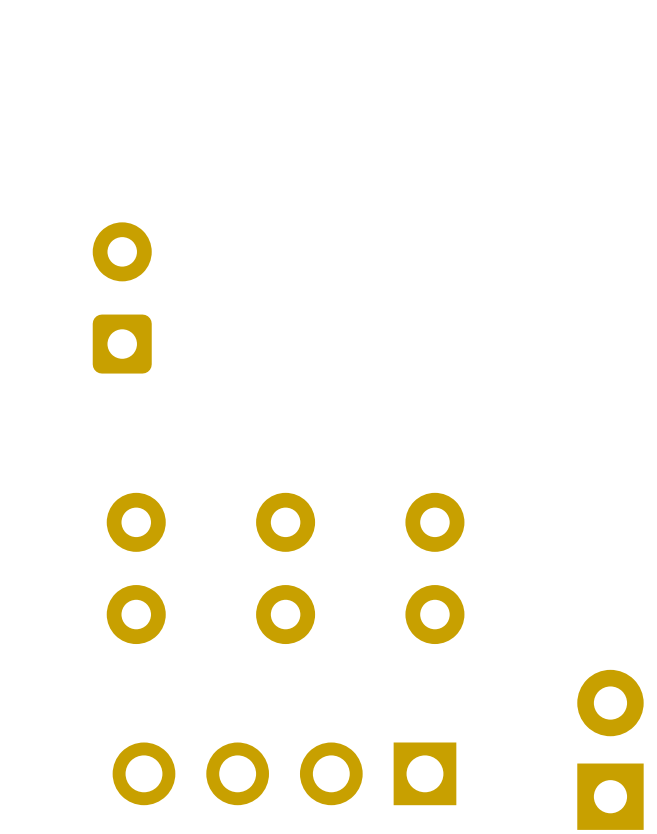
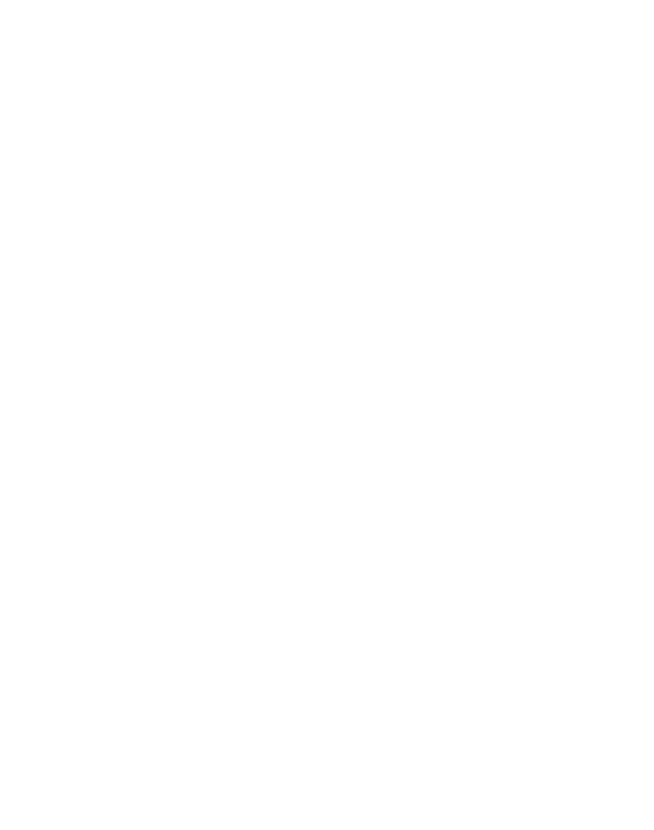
part: (122, 297) -> none
part: (136, 568) -> none
part: (285, 568) -> none
part: (434, 568) -> none
part: (610, 749) -> none
part: (284, 773) -> none

